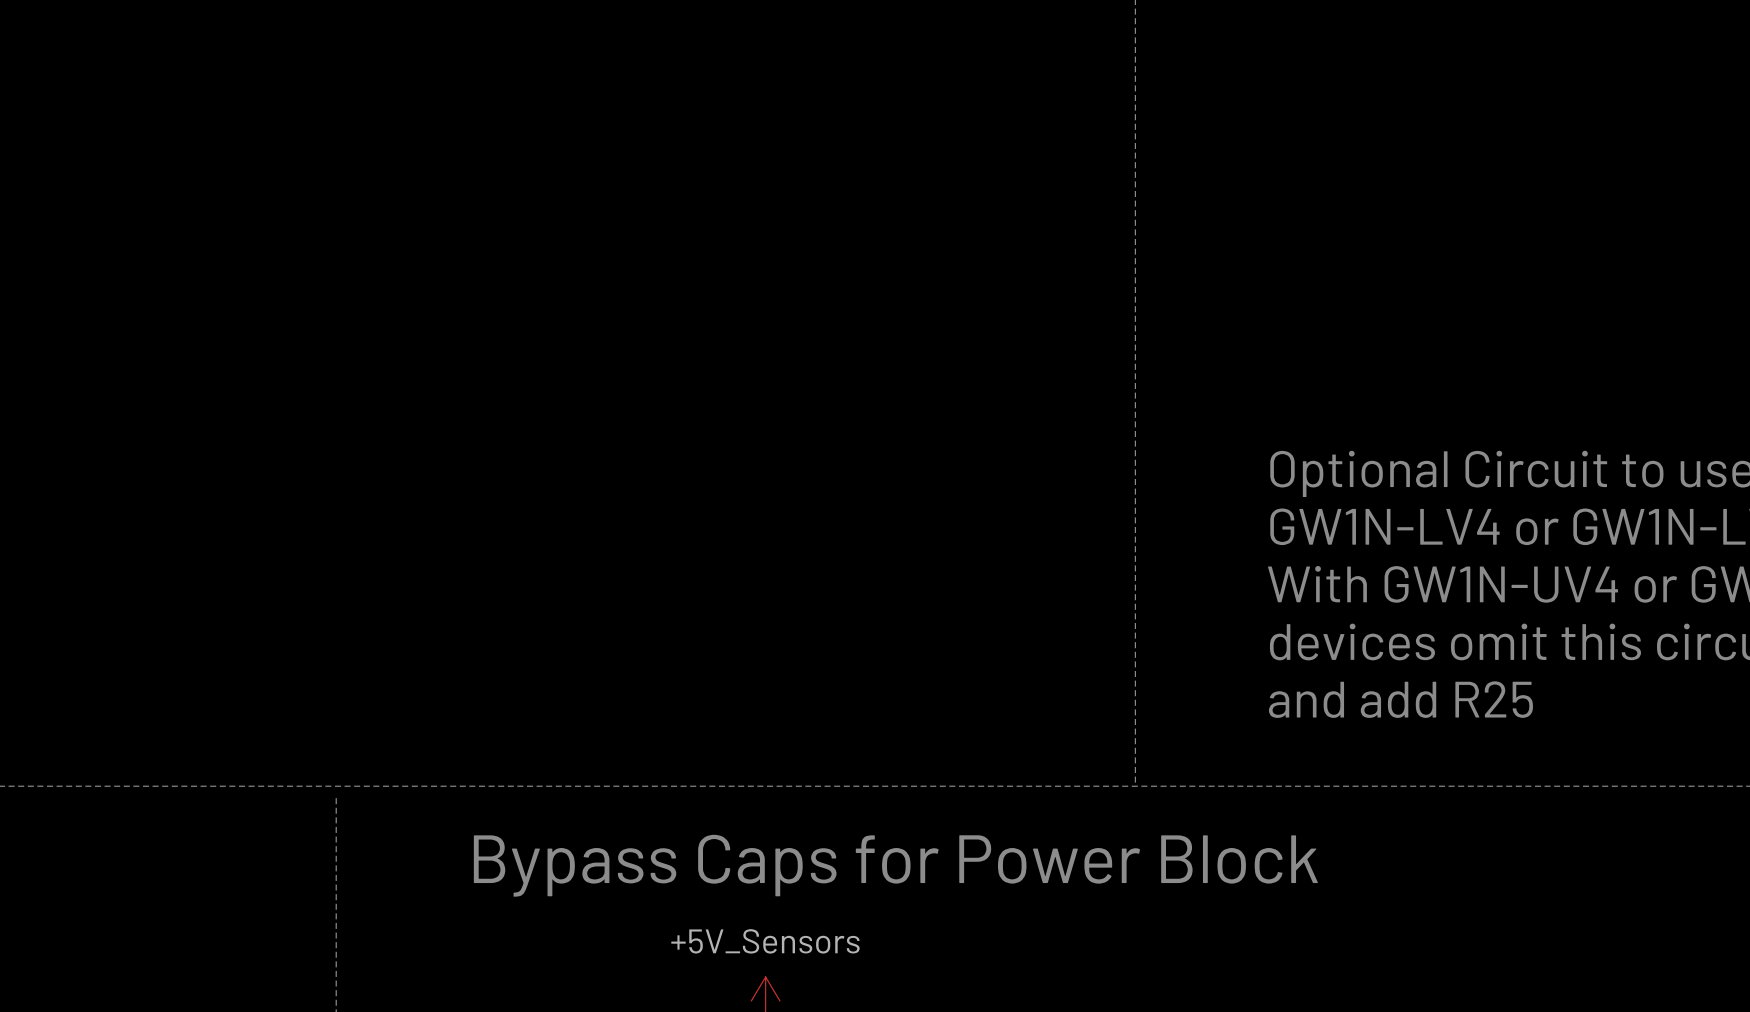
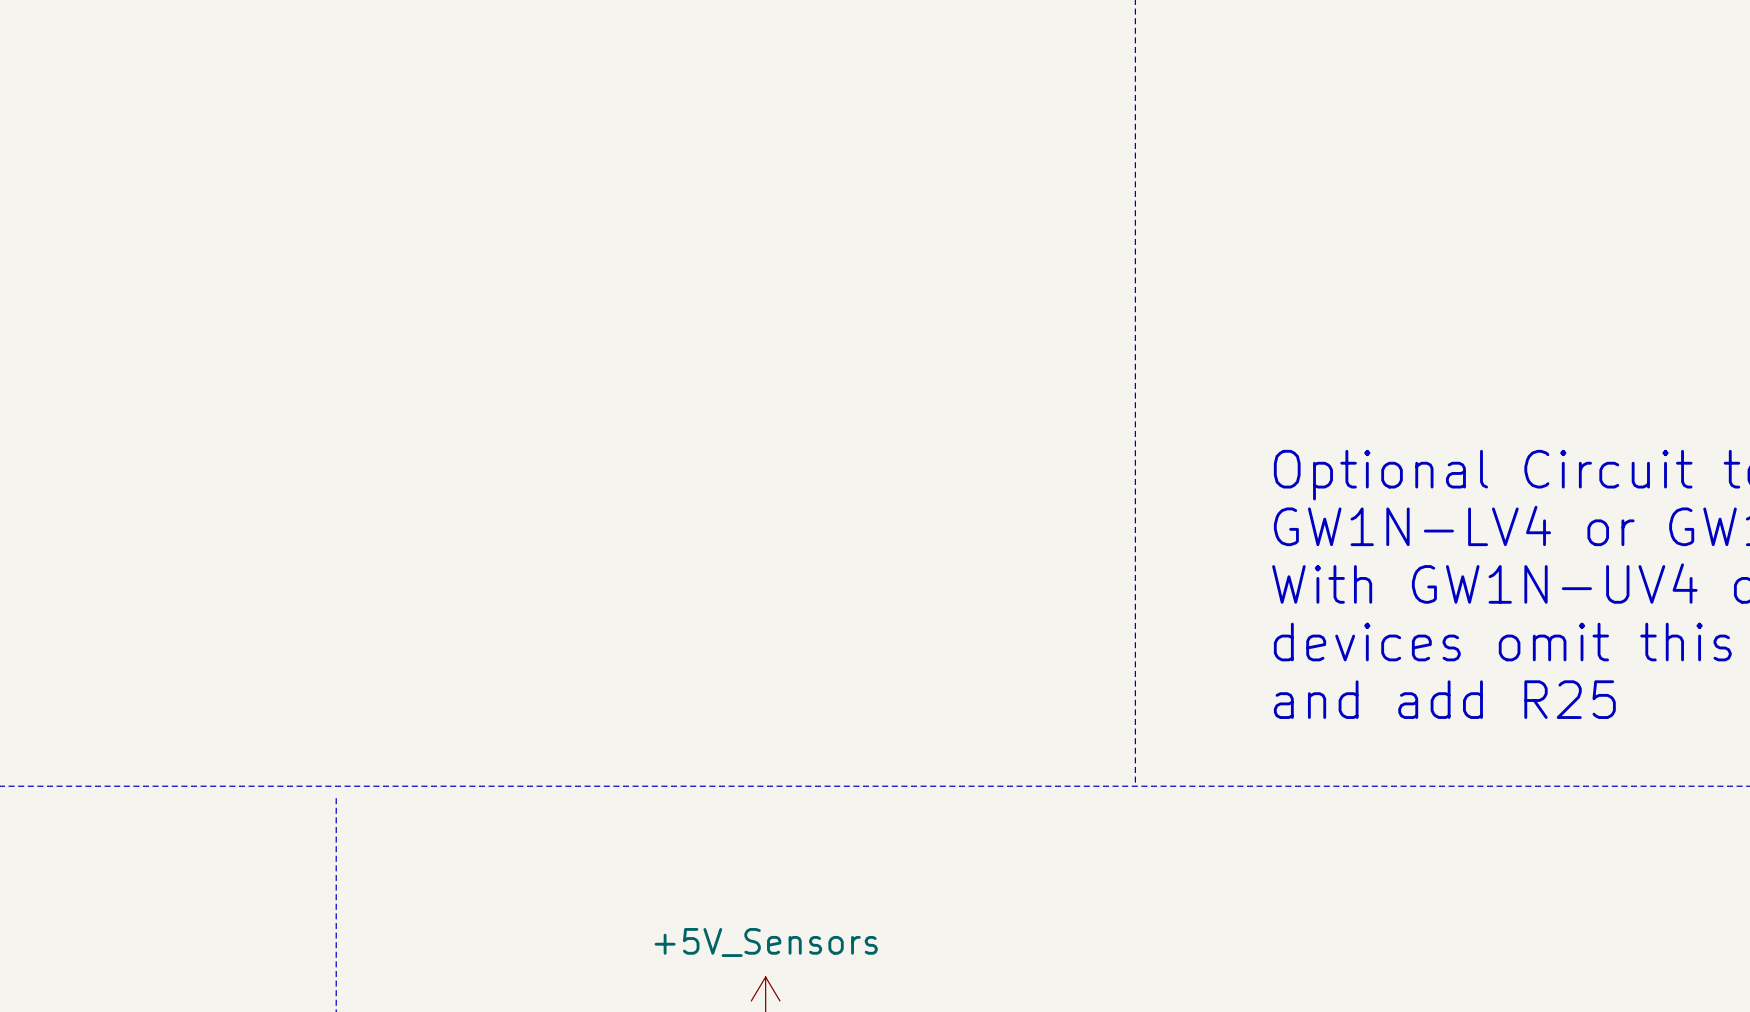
text: Bypass Caps for Power Block (895, 865) -> none

